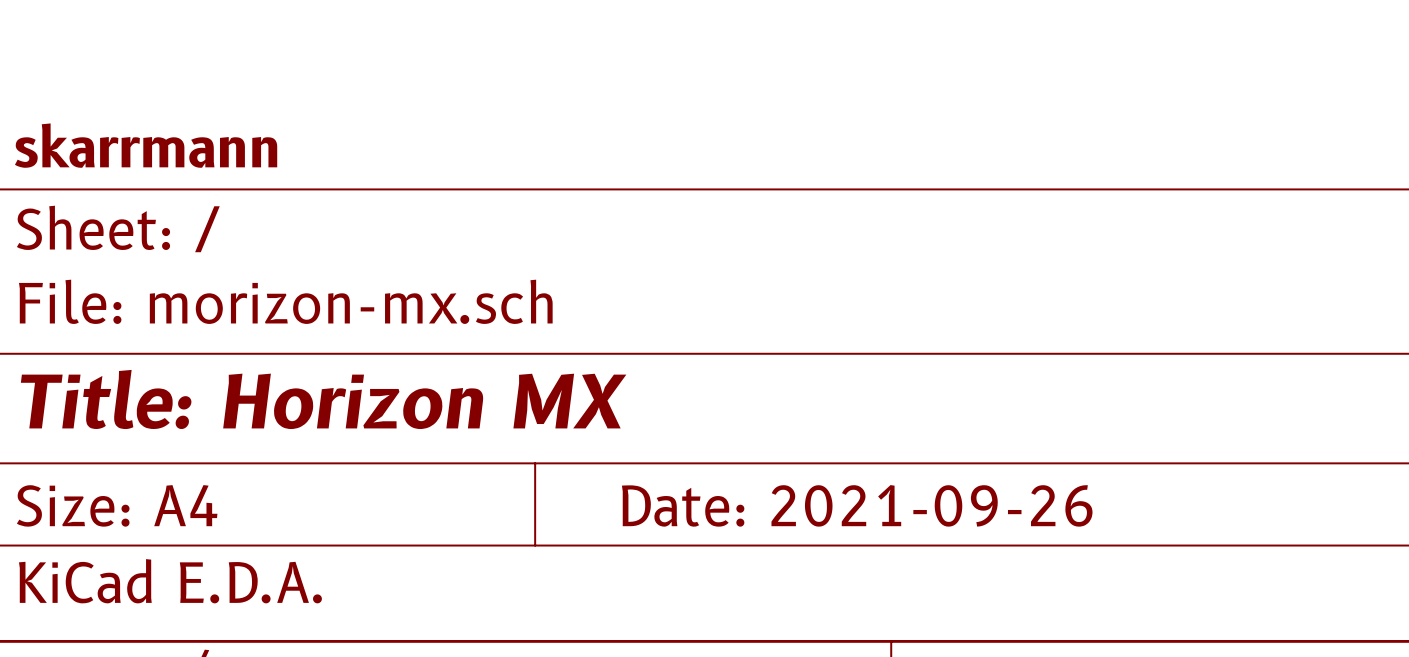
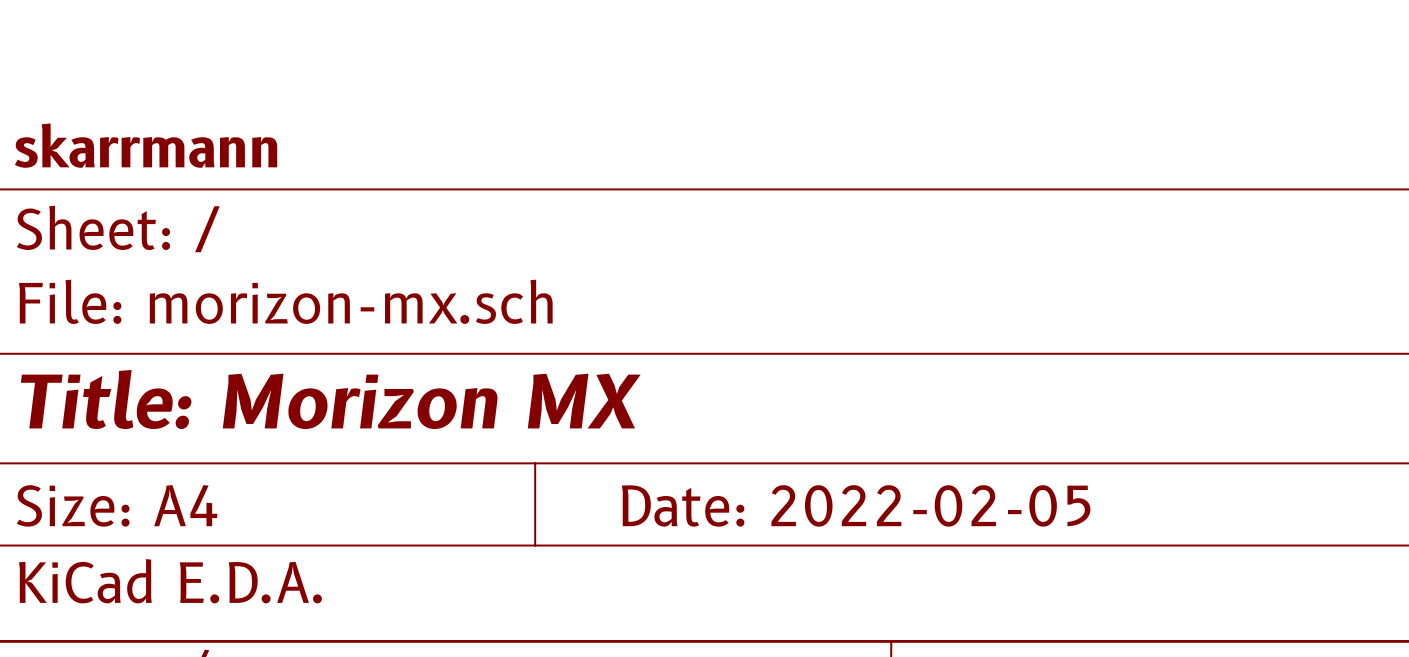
title block: Title: Horizon MX (323, 399) -> Title: Morizon MX (330, 399)
title block: Date: 2021-09-26 (857, 505) -> Date: 2022-02-05 (856, 505)

